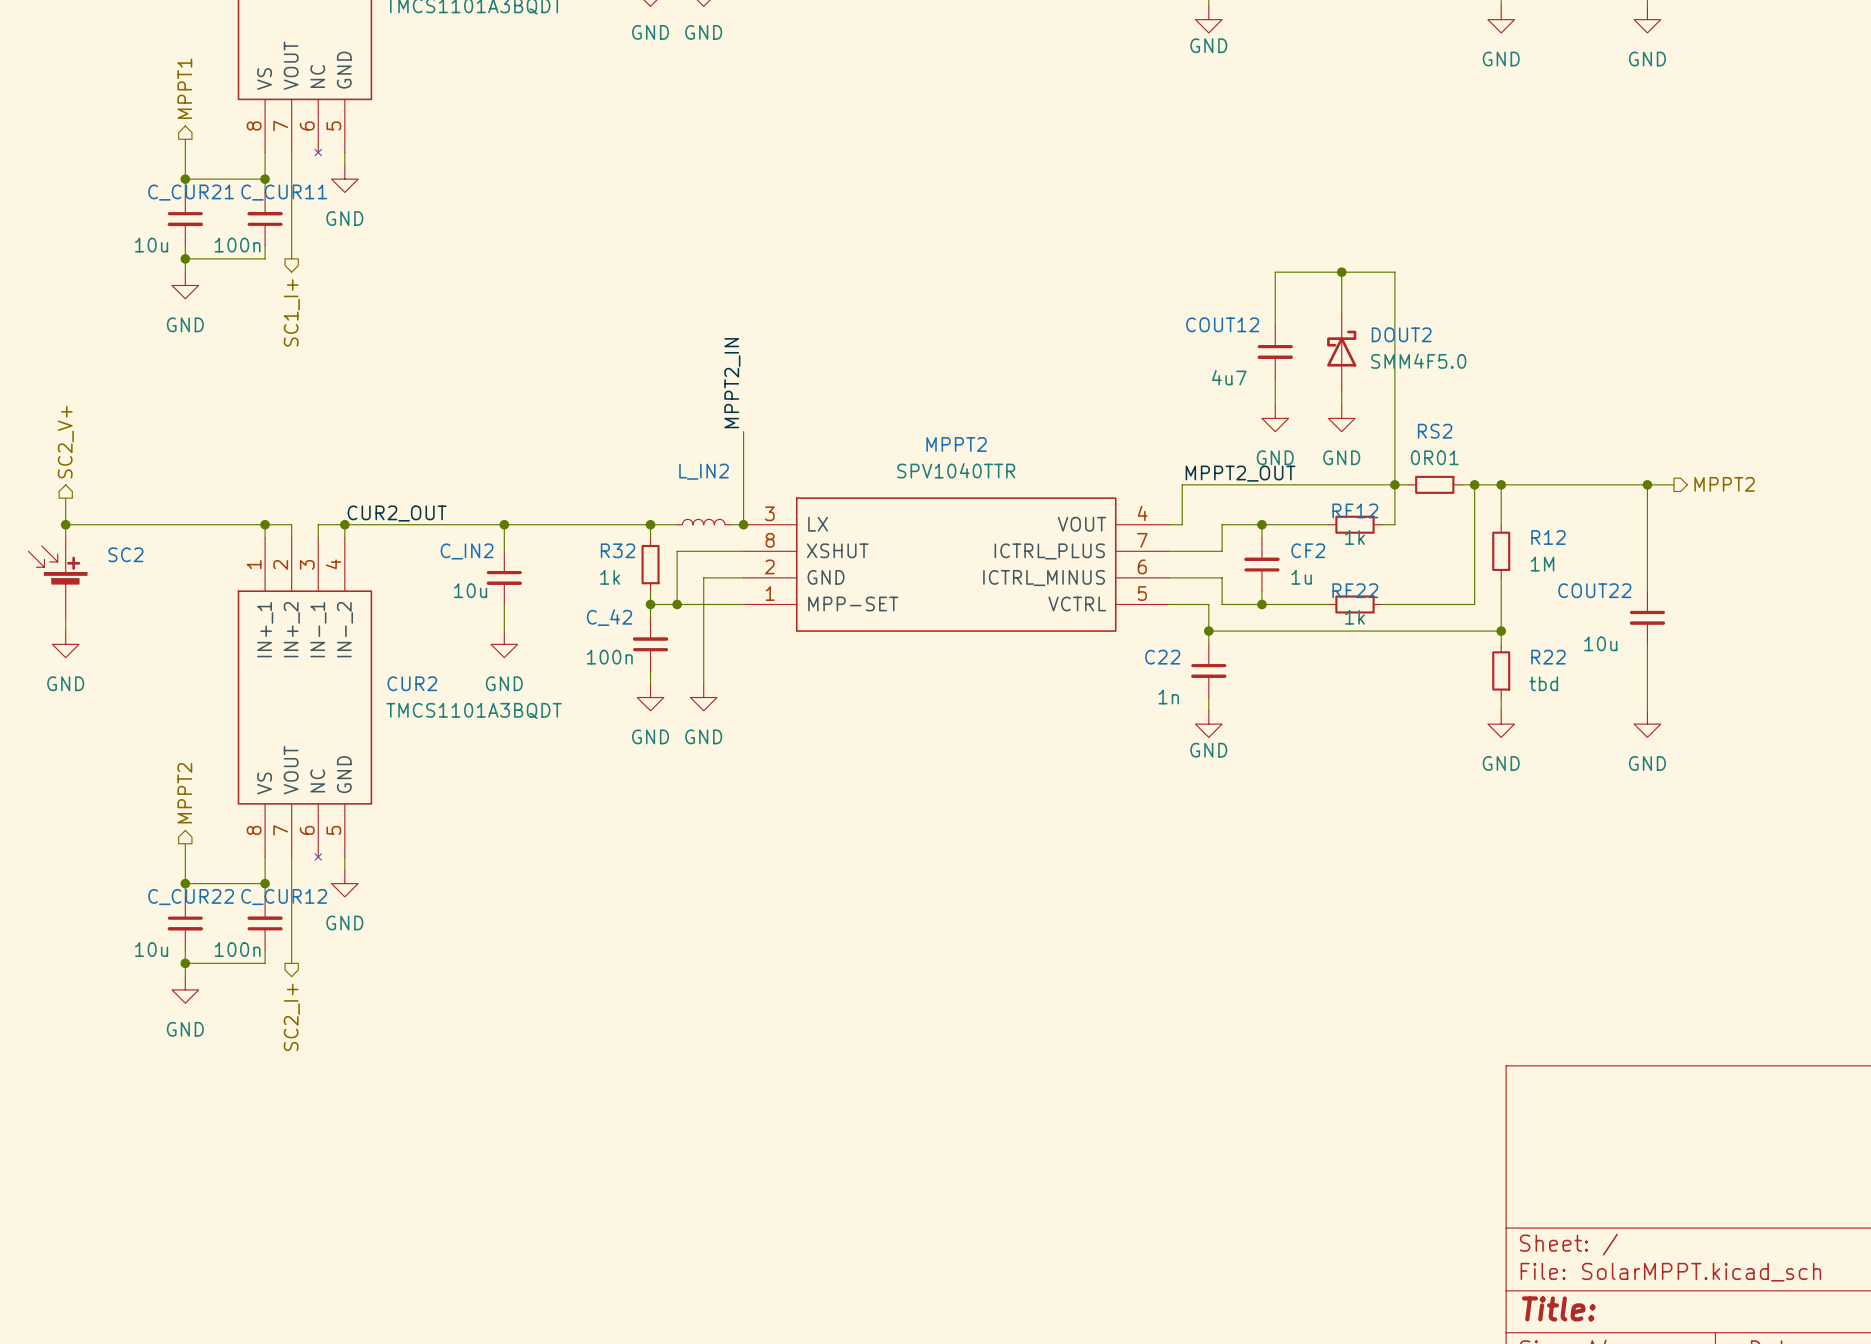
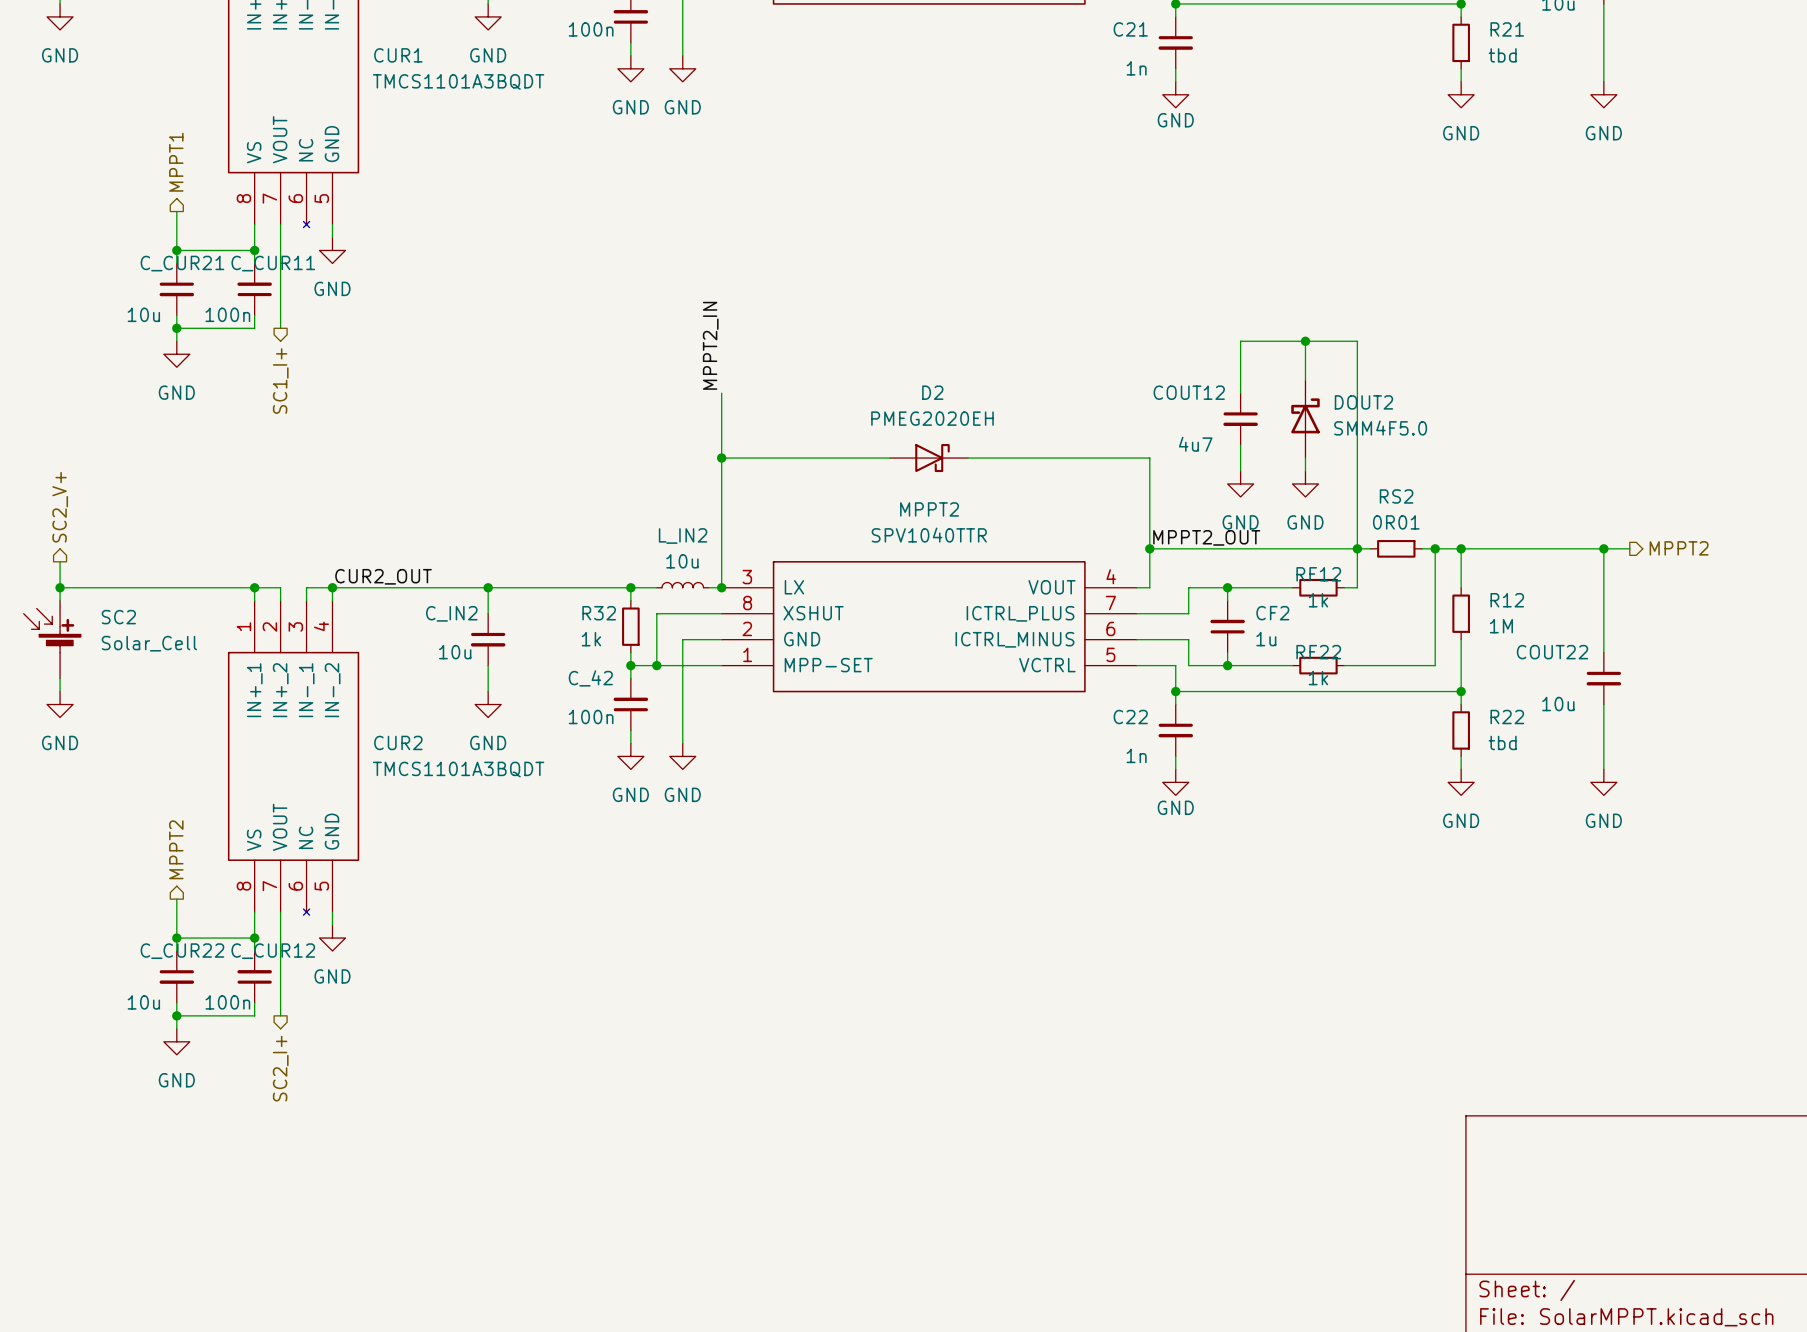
wire: none -> (721, 393) (721, 496)
label position: MPPT2_IN (732, 383) -> MPPT2_IN (710, 345)
wire: none -> (721, 458) (890, 458)
junction: none -> (721, 458)
D2: none -> PMEG2020EH (929, 458)
wire: none -> (968, 458) (1149, 458) (1149, 548)
junction: none -> (1149, 548)
L_IN2 value: none -> 10u (682, 561)
SC2 value: none -> Solar_Cell (149, 643)

